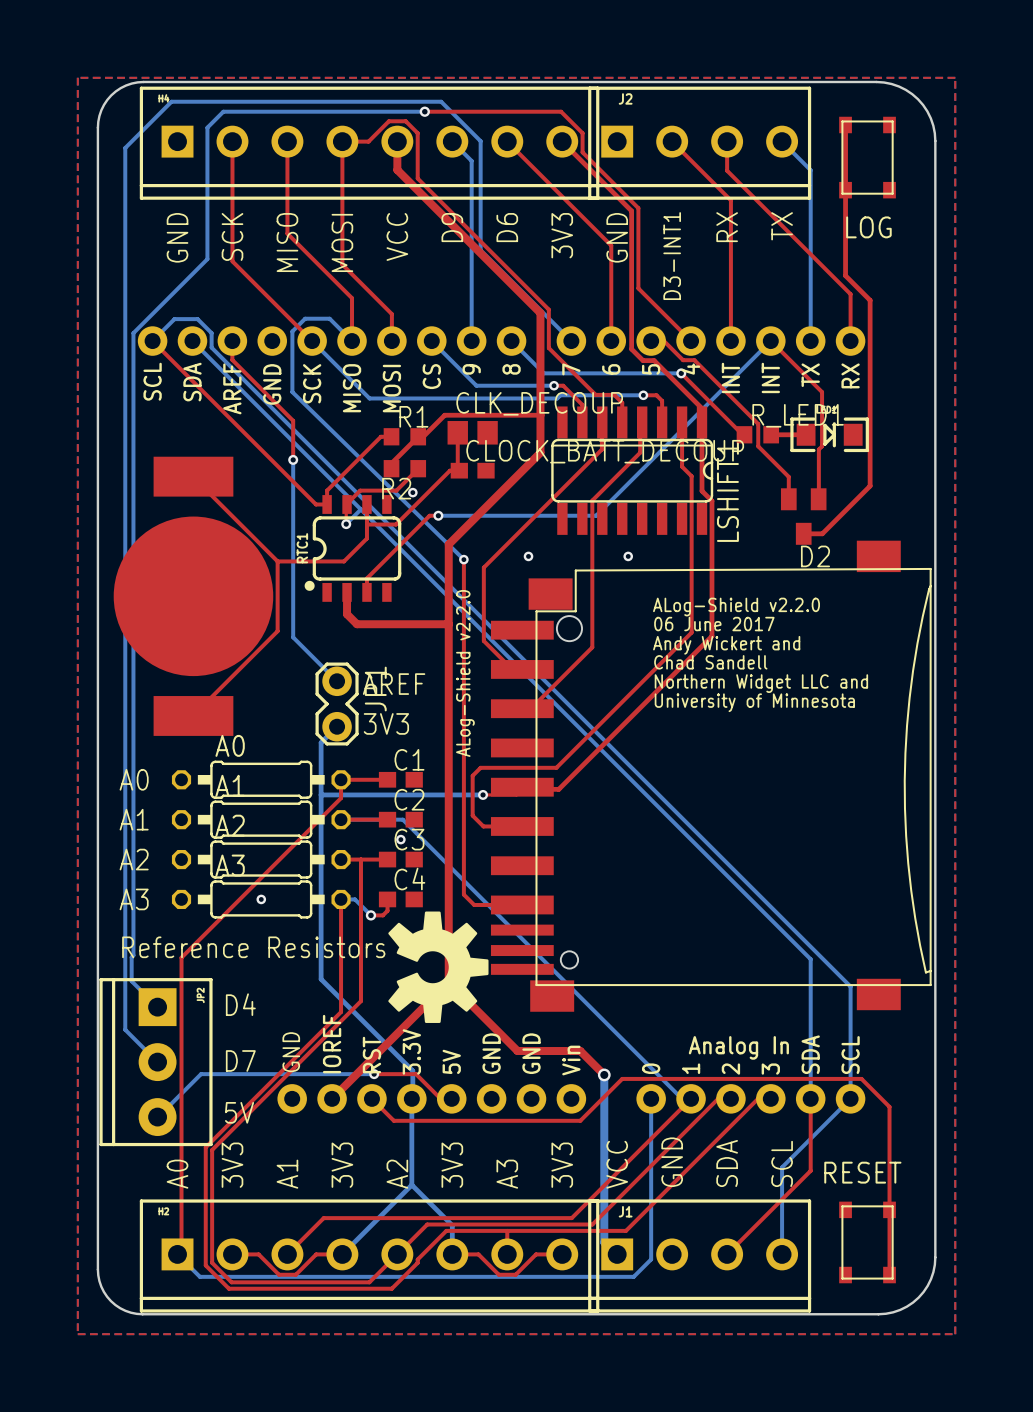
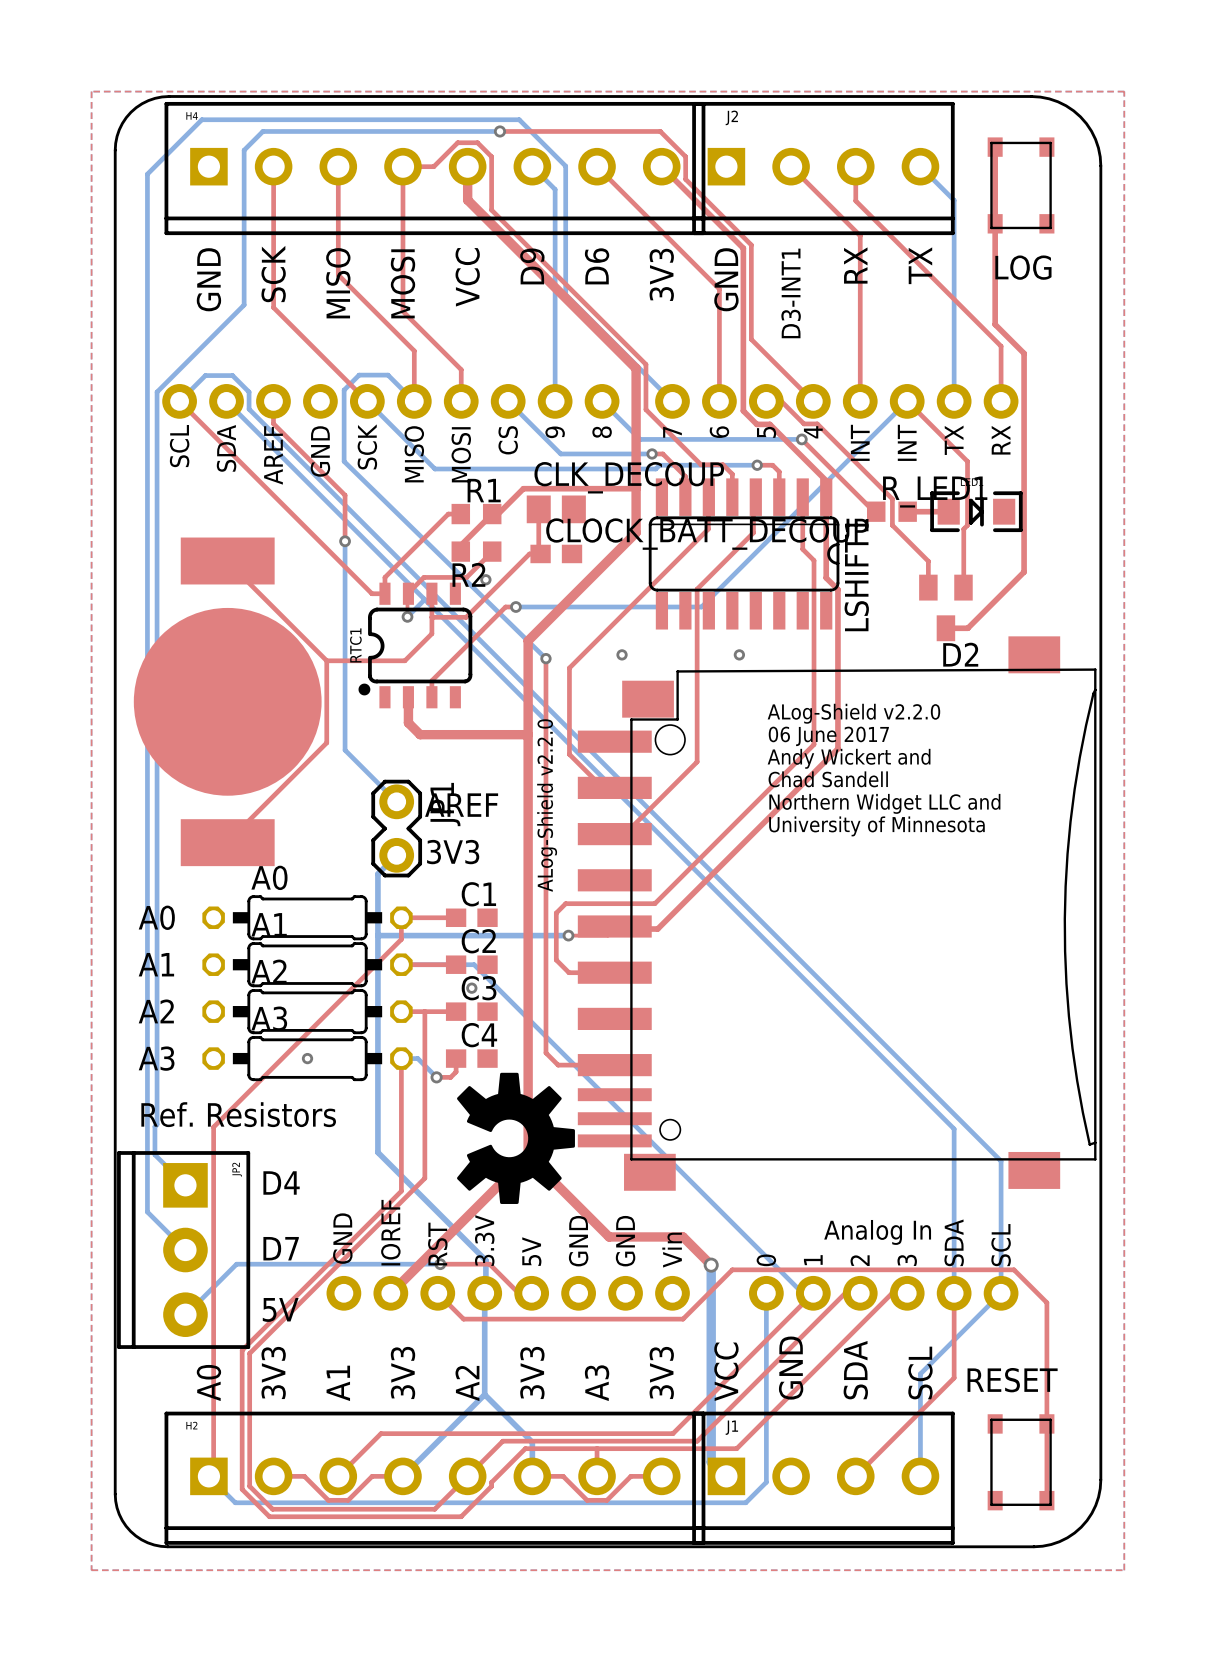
text: Reference Resistors (253, 947) -> Ref. Resistors (238, 1114)

